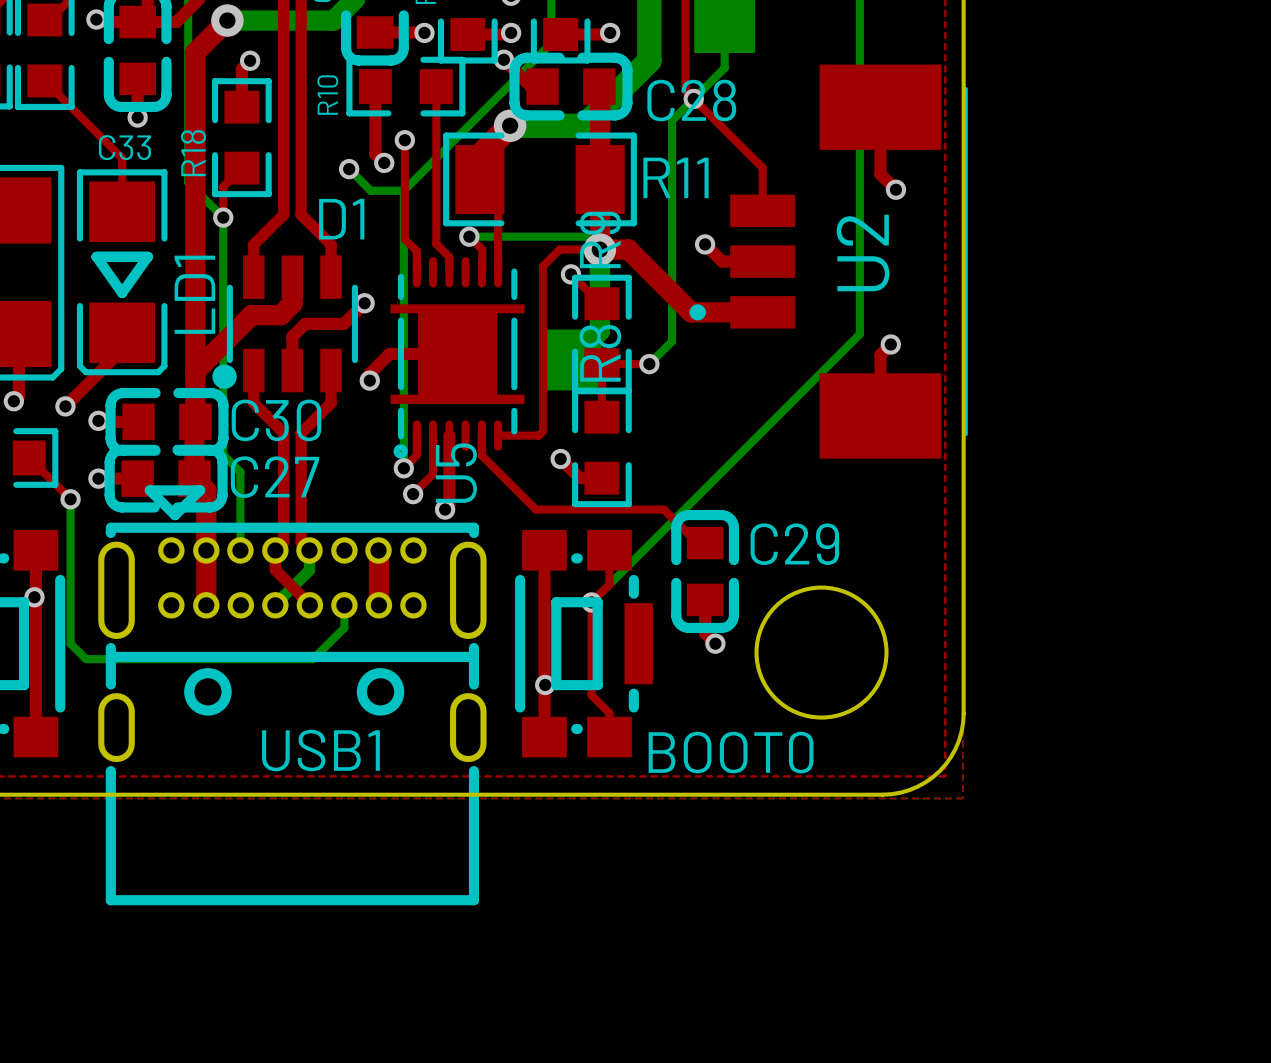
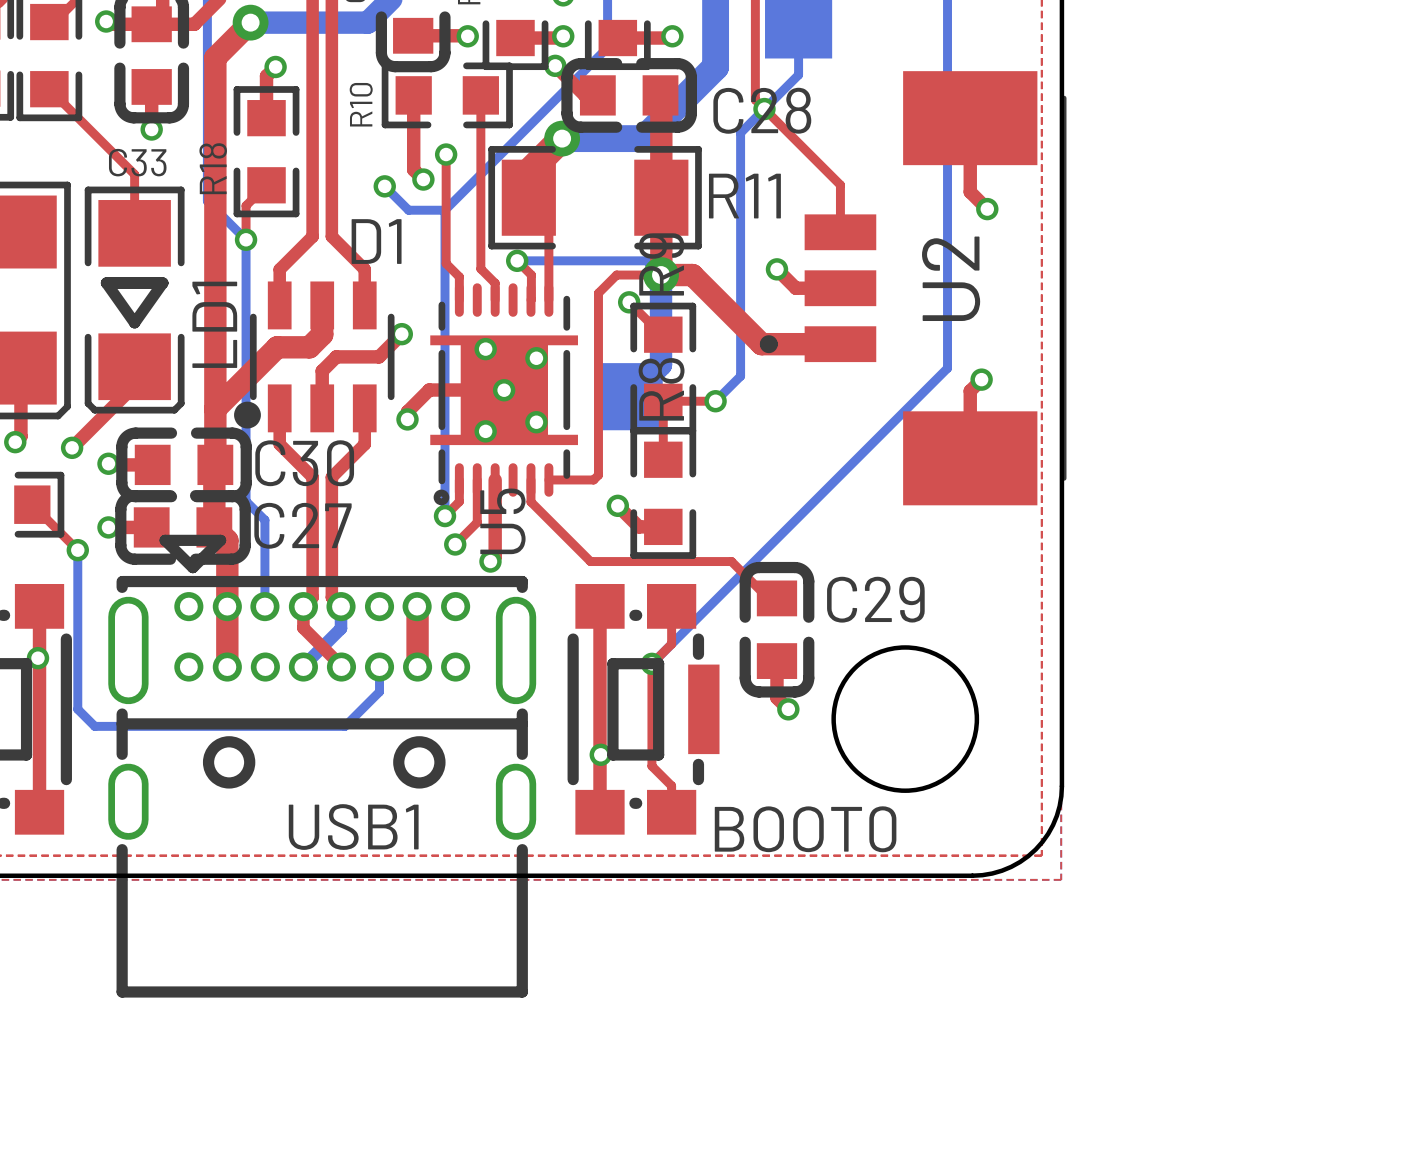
via: none -> (485, 349)
via: none -> (536, 358)
via: none -> (504, 390)
via: none -> (536, 422)
via: none -> (485, 431)

